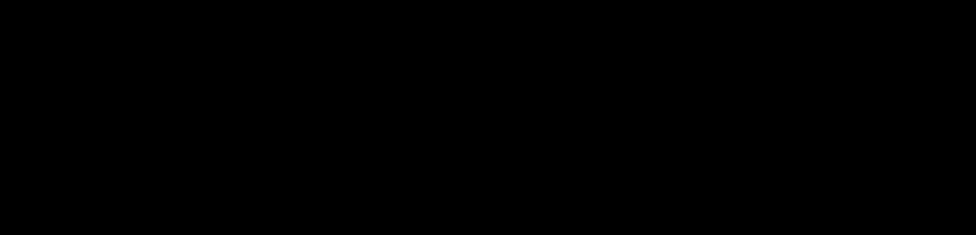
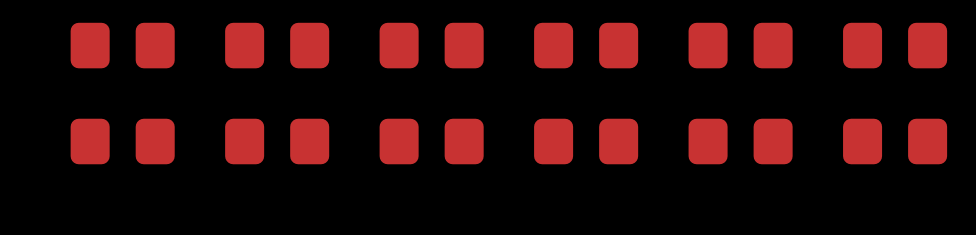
part: none -> (122, 45)
part: none -> (277, 45)
part: none -> (431, 45)
part: none -> (586, 45)
part: none -> (740, 45)
part: none -> (895, 45)
part: none -> (122, 141)
part: none -> (277, 141)
part: none -> (431, 141)
part: none -> (586, 141)
part: none -> (740, 141)
part: none -> (895, 141)

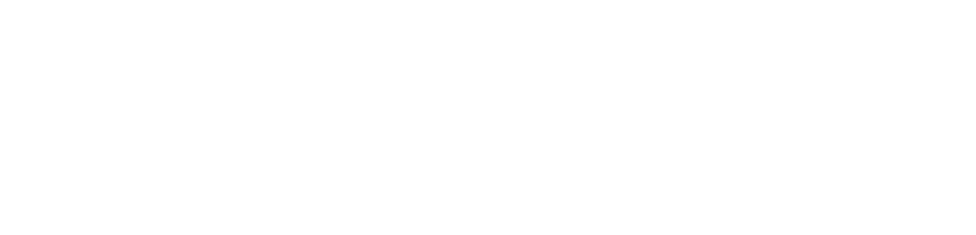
part: (122, 45) -> none
part: (277, 45) -> none
part: (431, 45) -> none
part: (586, 45) -> none
part: (740, 45) -> none
part: (895, 45) -> none
part: (122, 141) -> none
part: (277, 141) -> none
part: (431, 141) -> none
part: (586, 141) -> none
part: (740, 141) -> none
part: (895, 141) -> none

